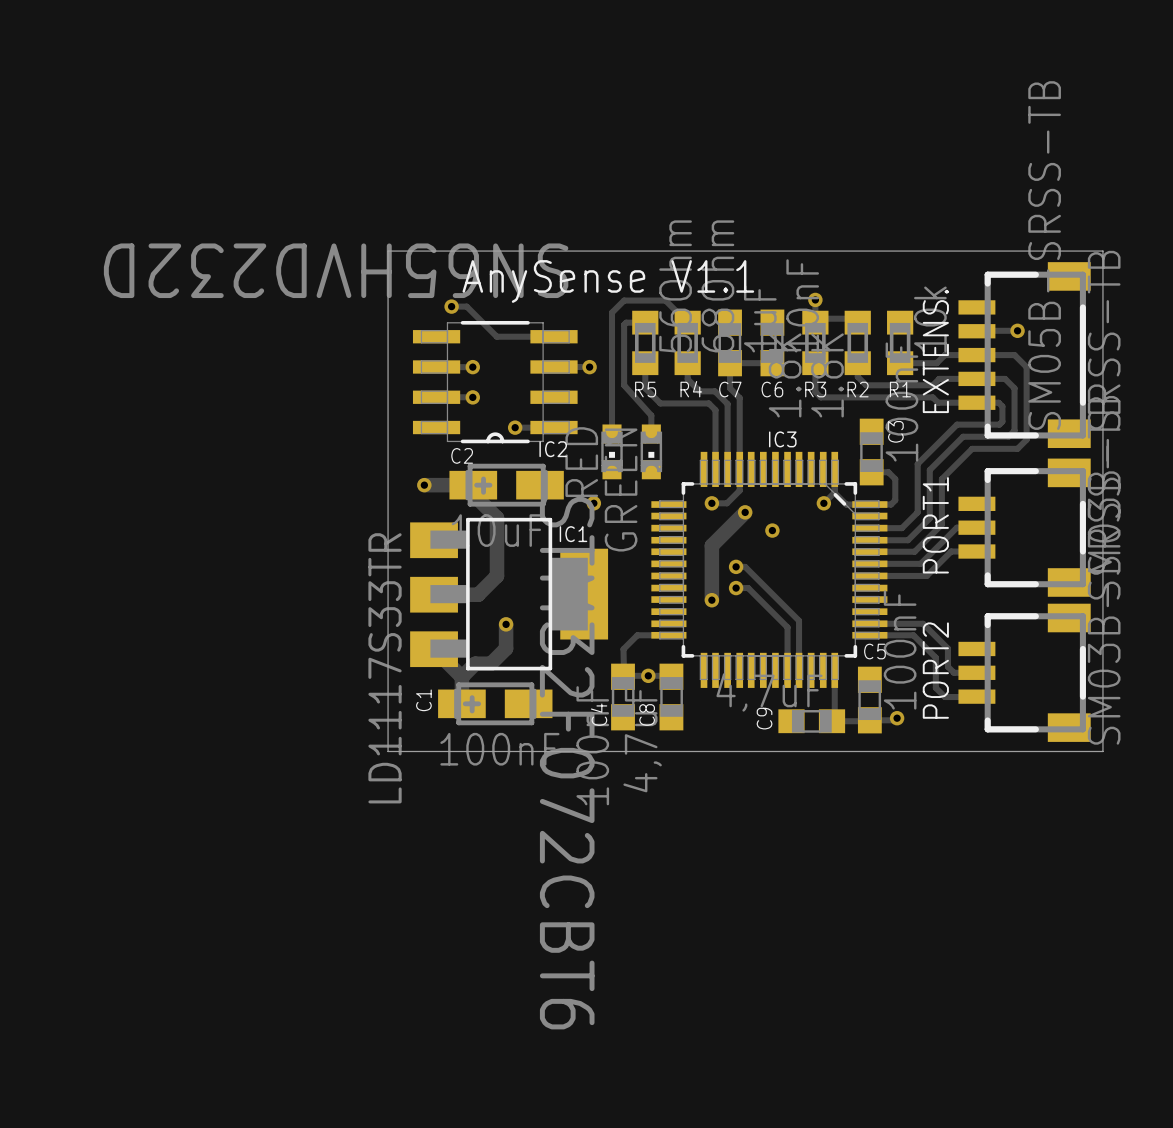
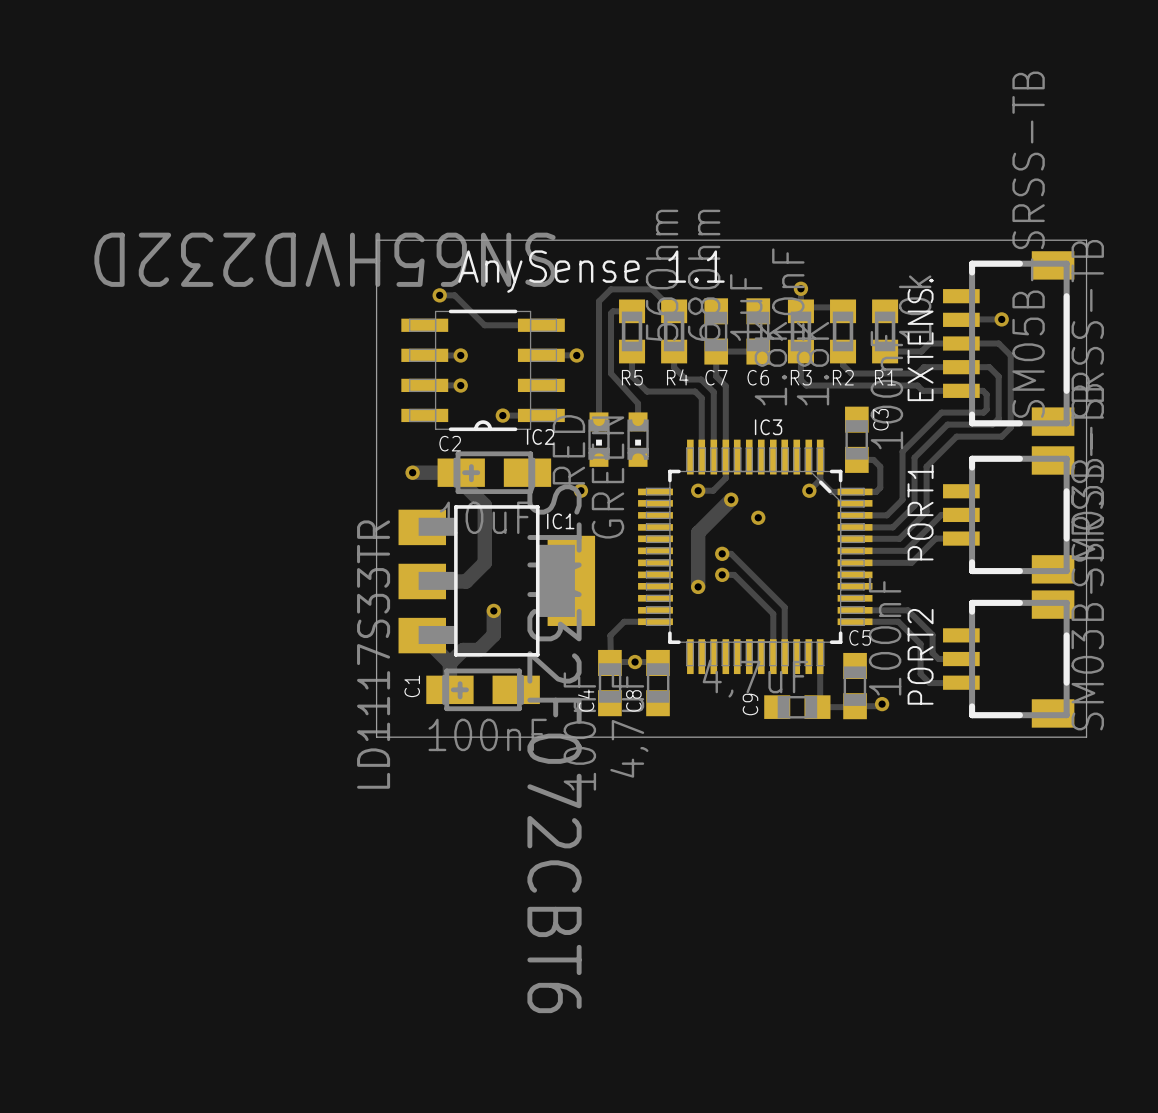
text: AnySense V1.1 (608, 281) -> AnySense 1.1 (591, 271)

